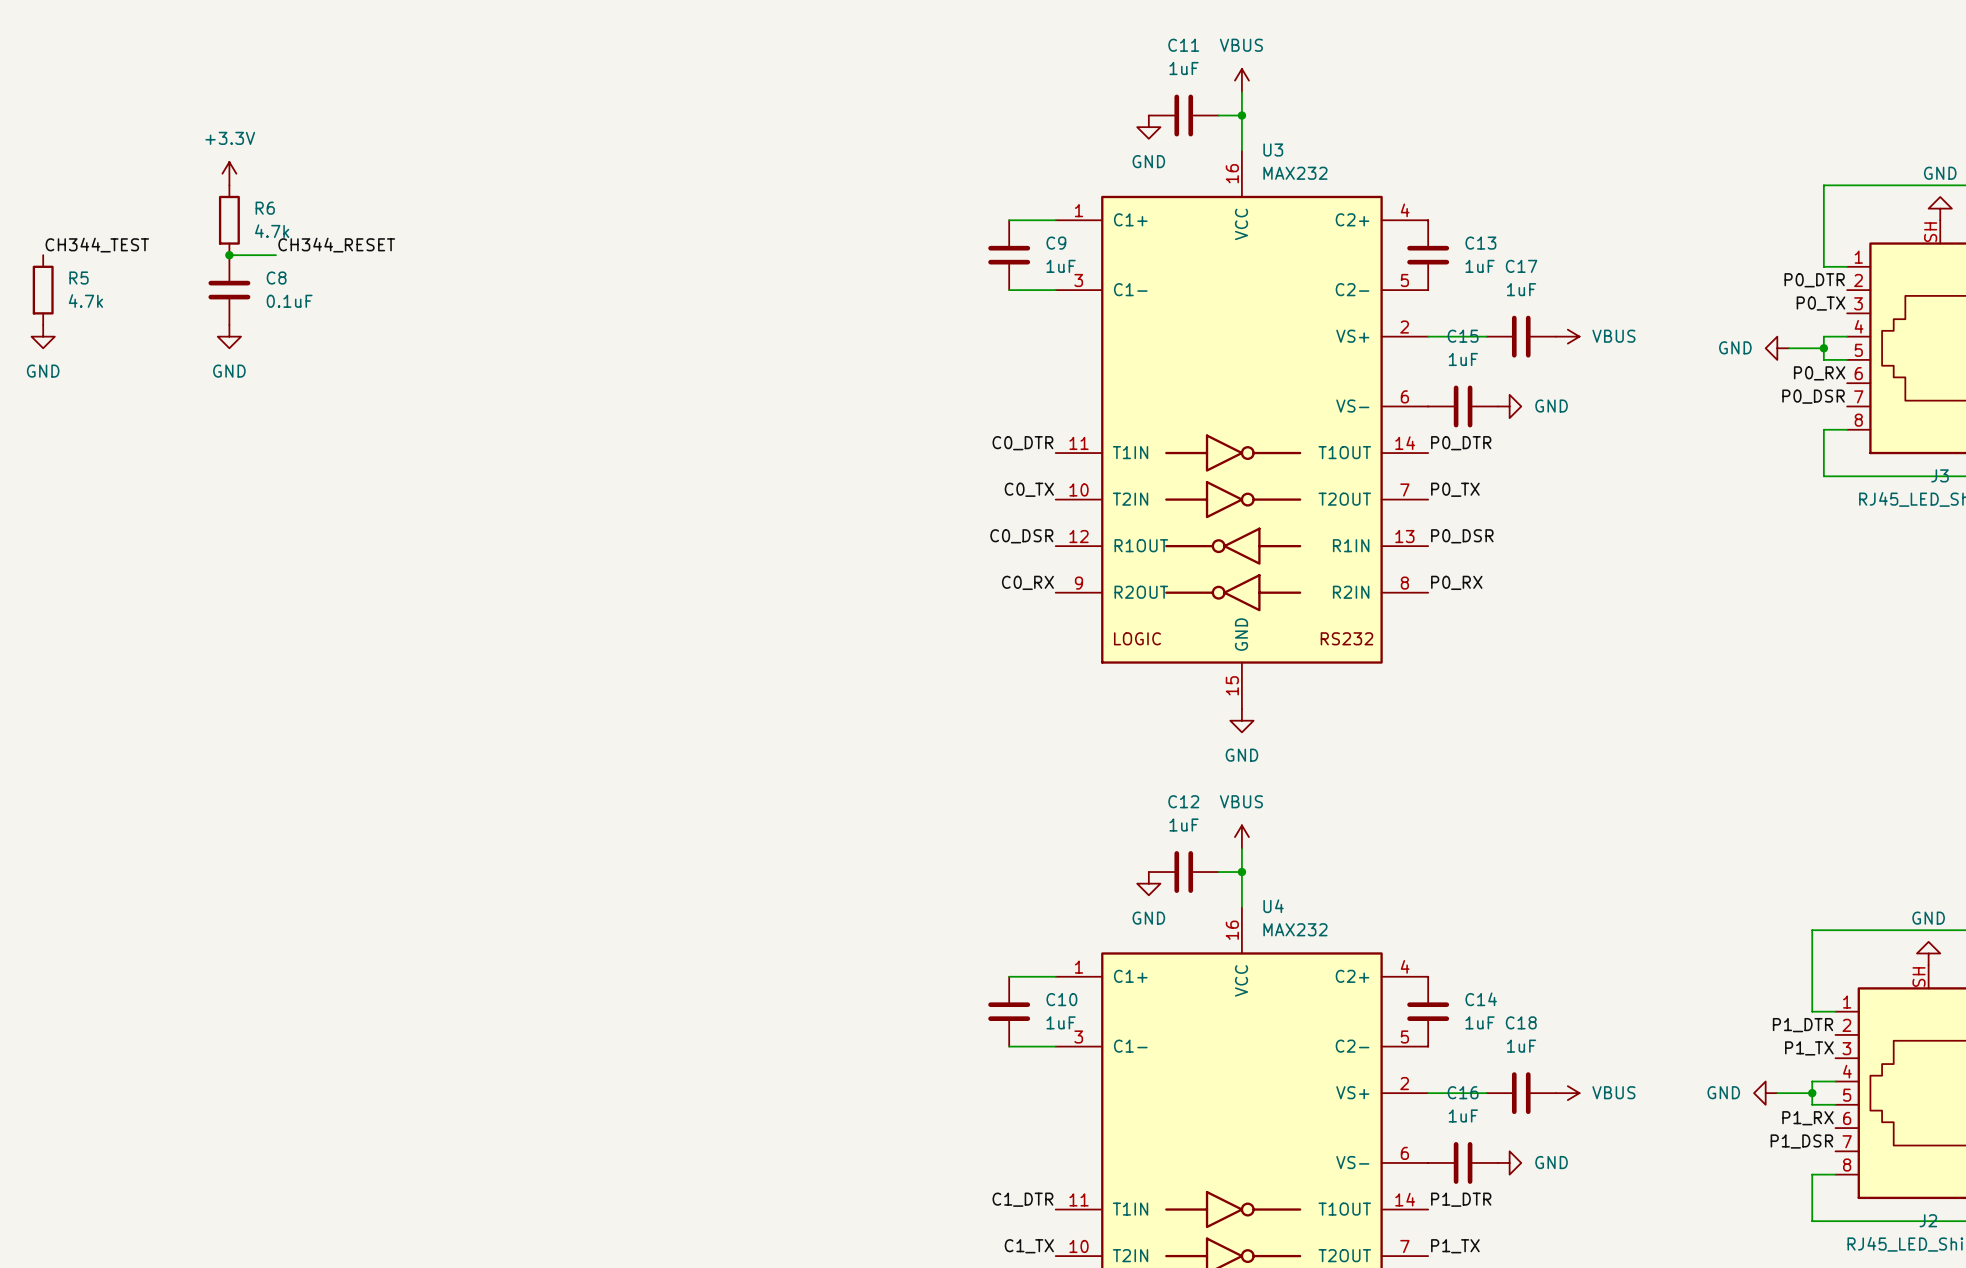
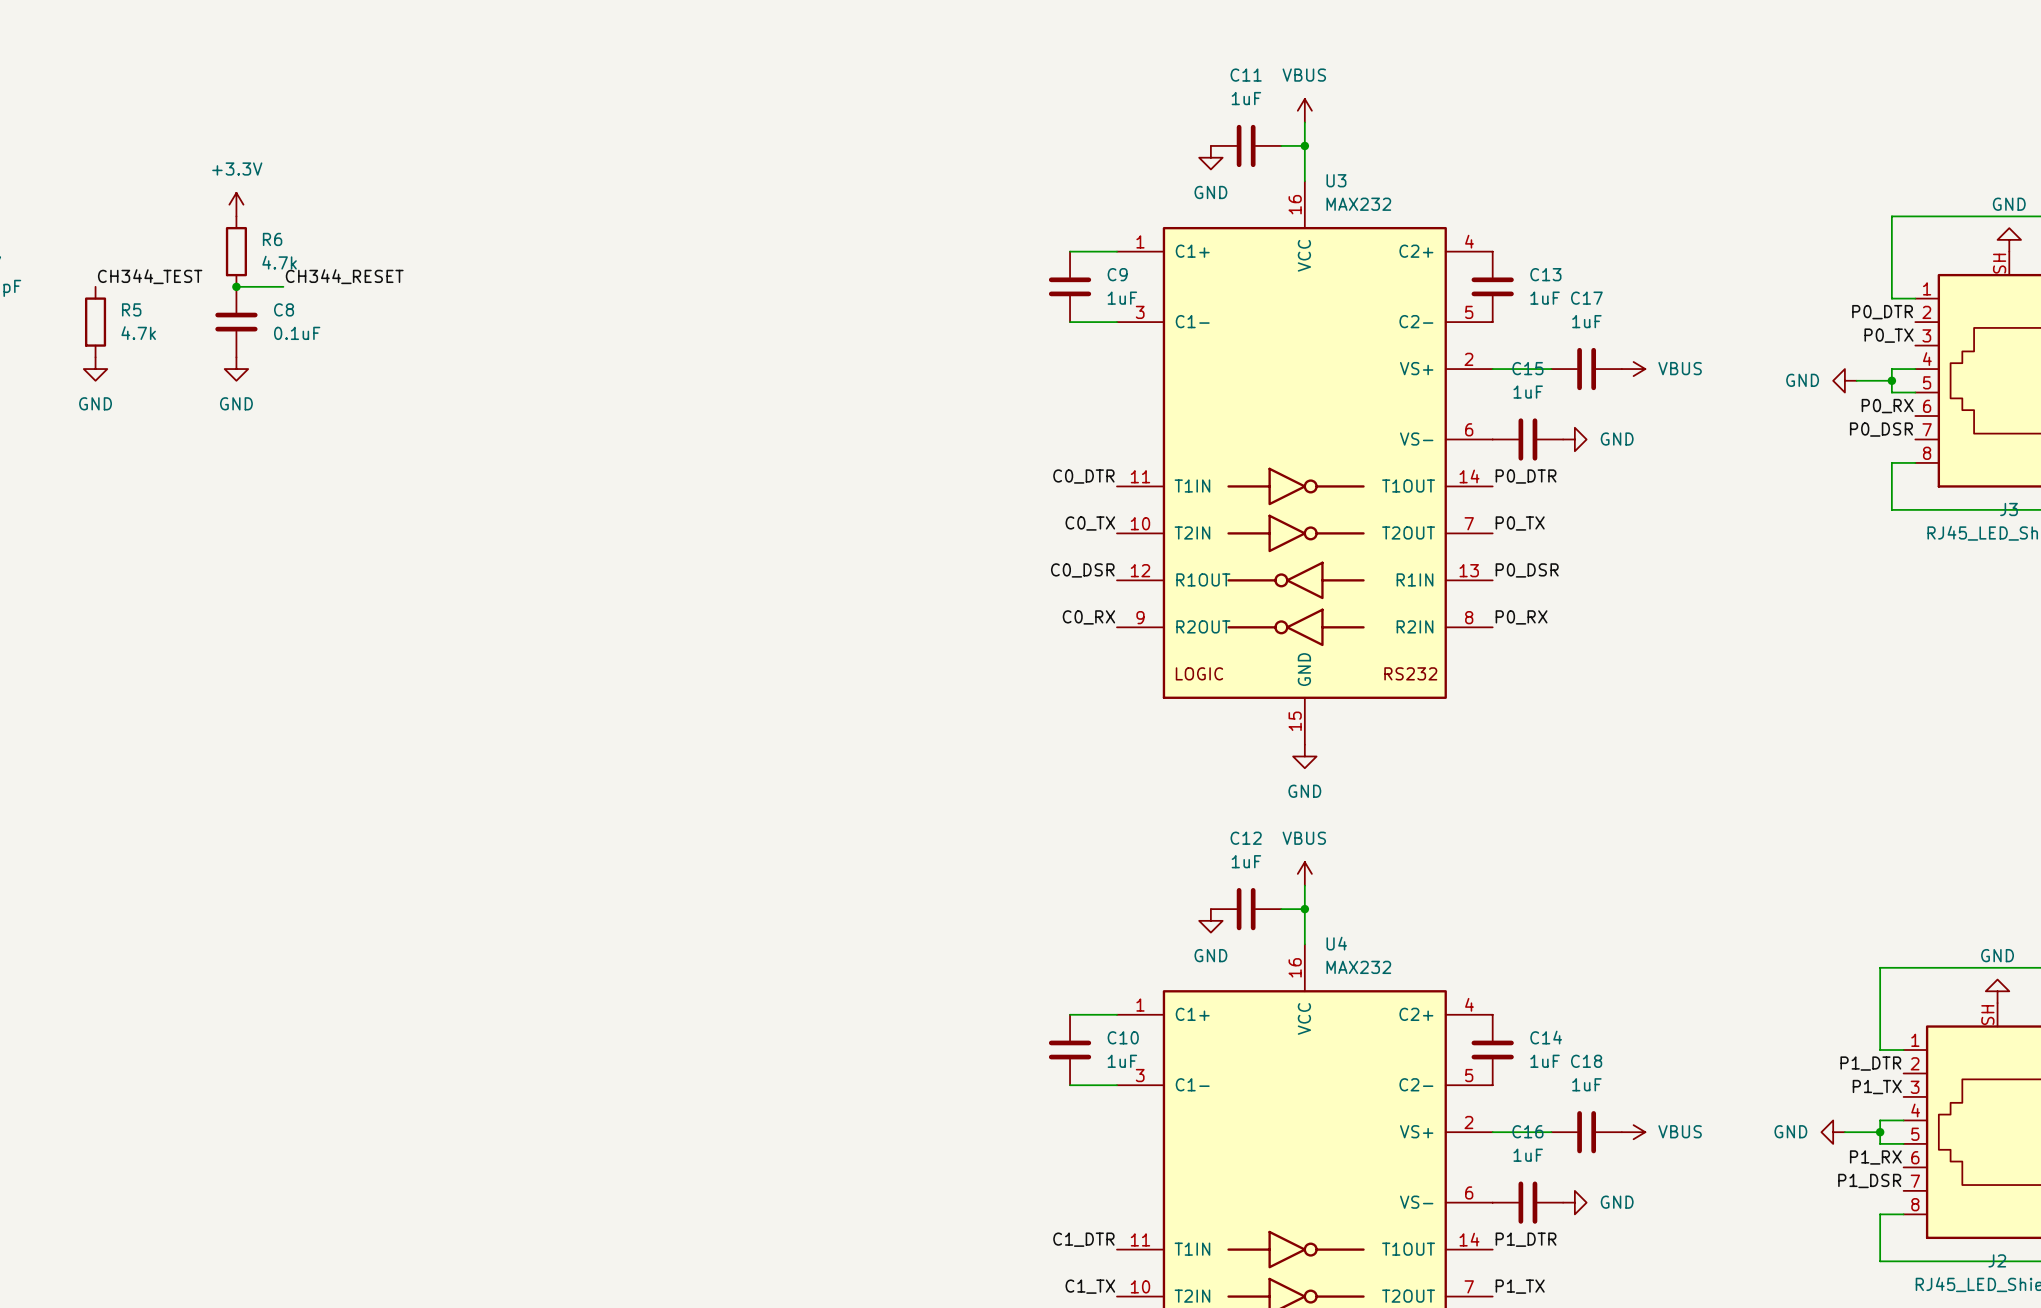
power symbol position: +3.3V (229, 173) -> +3.3V (236, 204)
R6 position: (229, 220) -> (236, 251)
label position: CH344_RESET (336, 245) -> CH344_RESET (344, 276)
wire: (229, 255) (275, 255) -> (283, 286) (236, 286)
junction position: (229, 255) -> (236, 286)
C8 position: (229, 290) -> (236, 322)
power symbol position: GND (229, 336) -> GND (236, 369)

